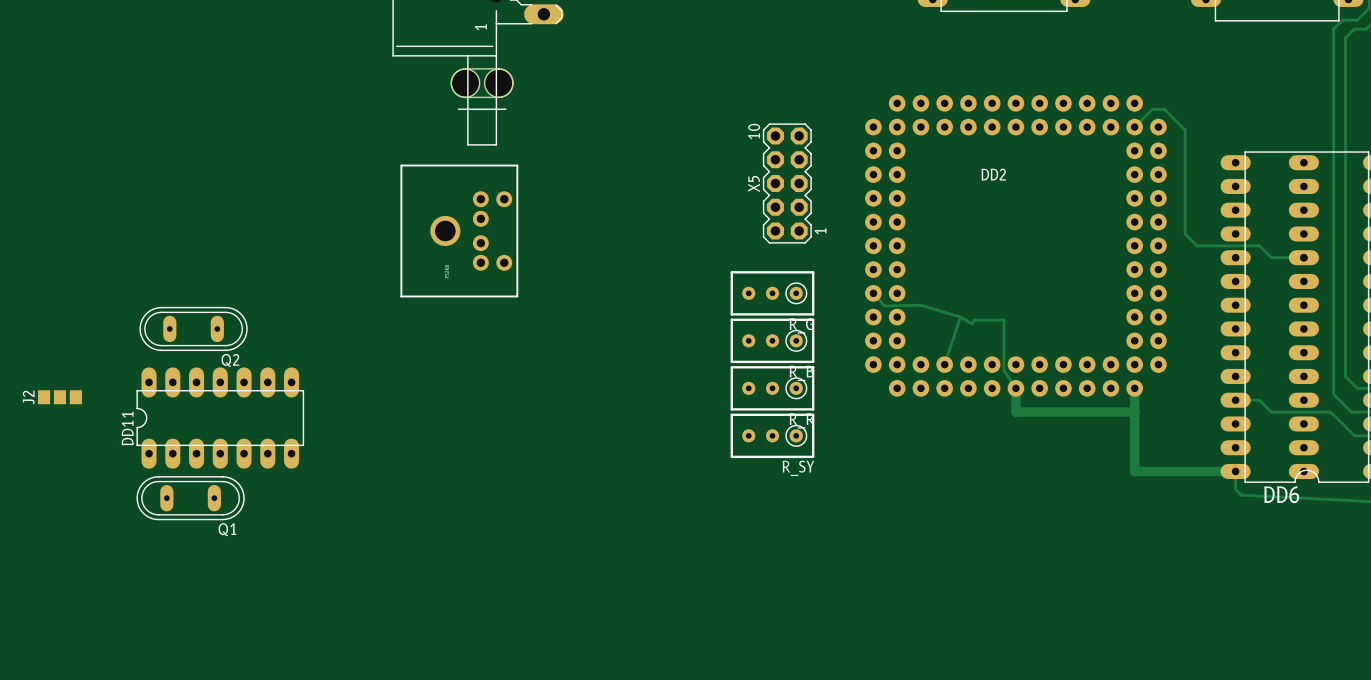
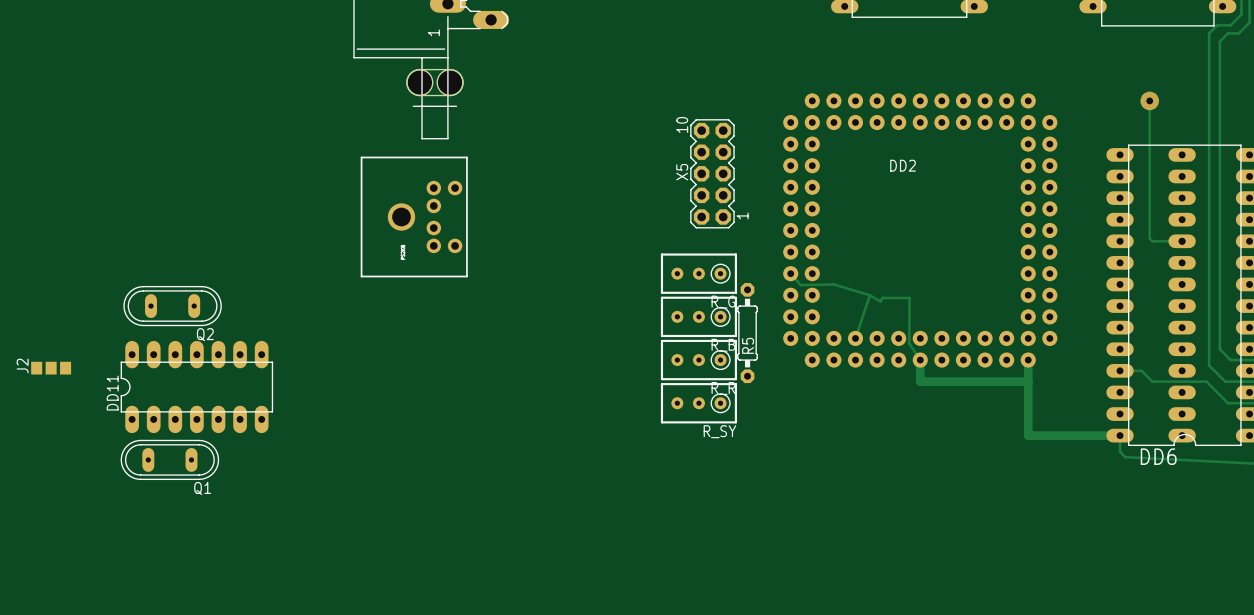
via: none -> (1149, 100)
track: (1134, 127) (1152, 109) (1164, 109) (1185, 130) (1185, 233) (1197, 245) (1259, 245) (1268, 254) -> (1149, 100) (1149, 238)
R5: none -> (747, 333)

